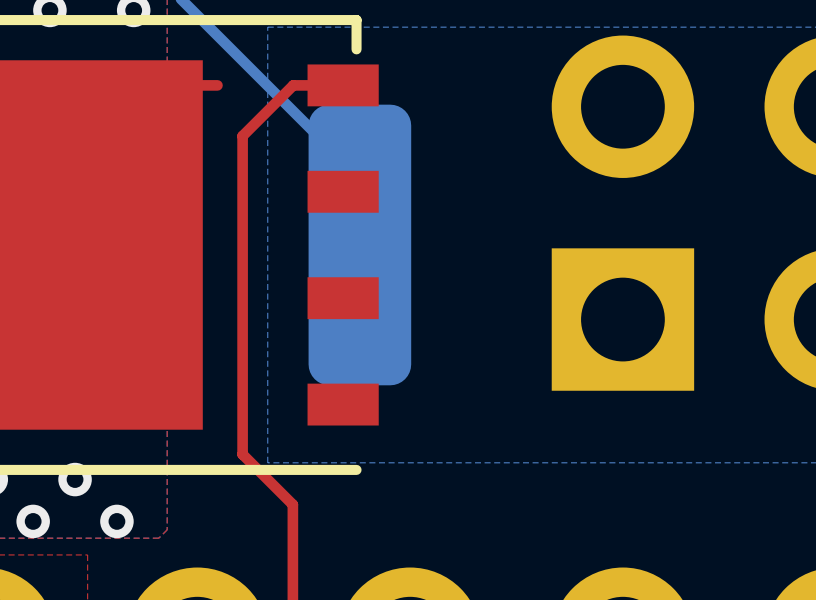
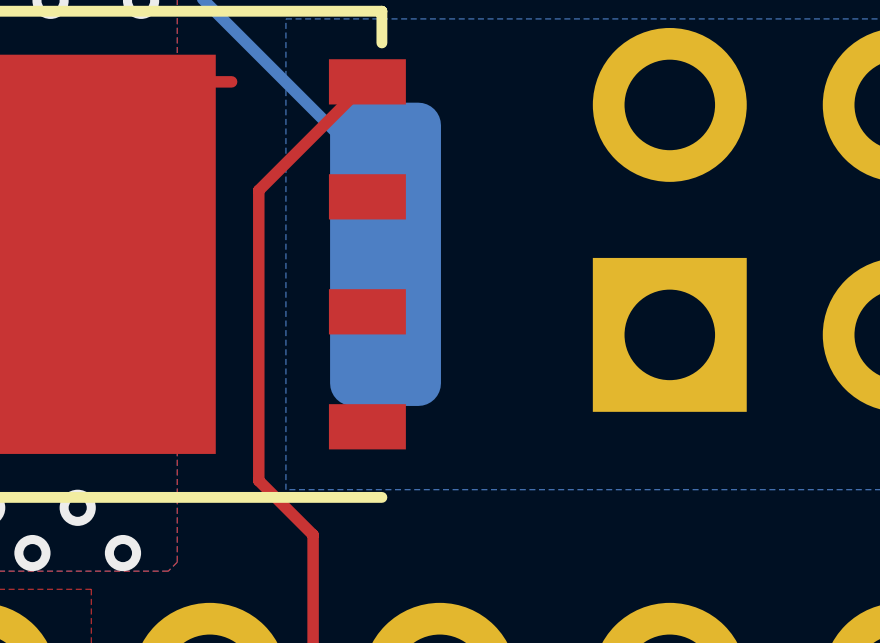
top track: (343, 85) (293, 85) (242, 136) (242, 185) -> (367, 81) (258, 190)

